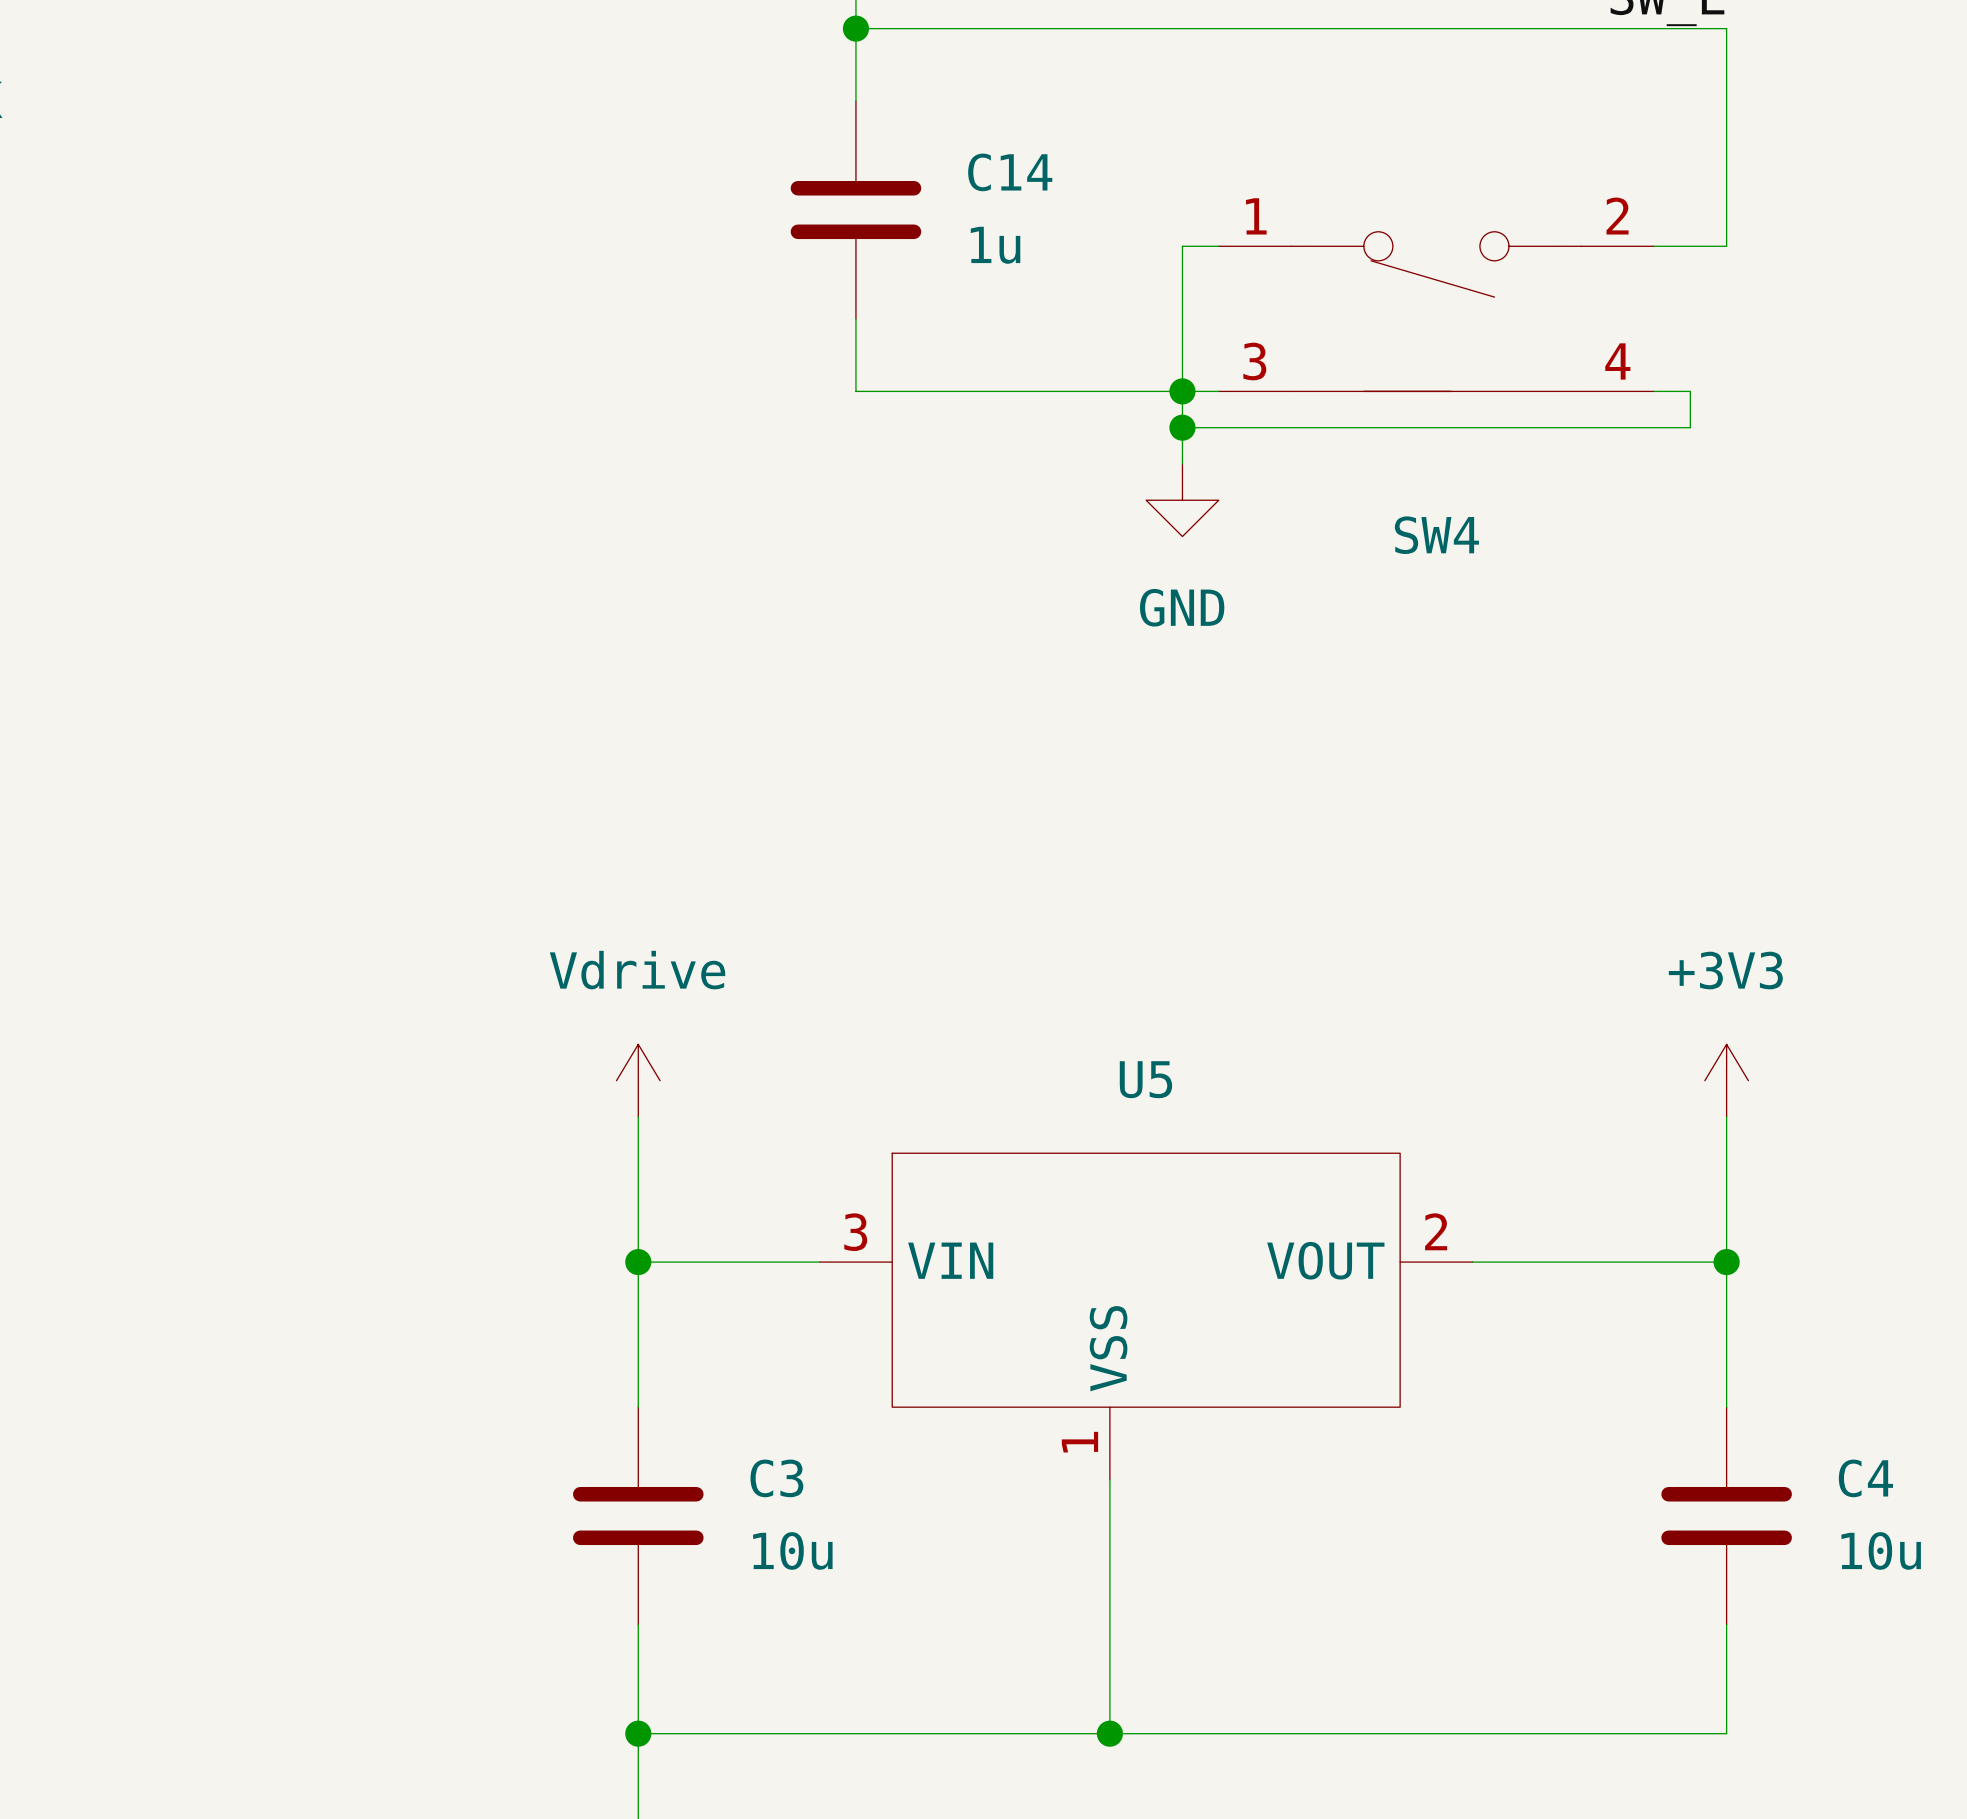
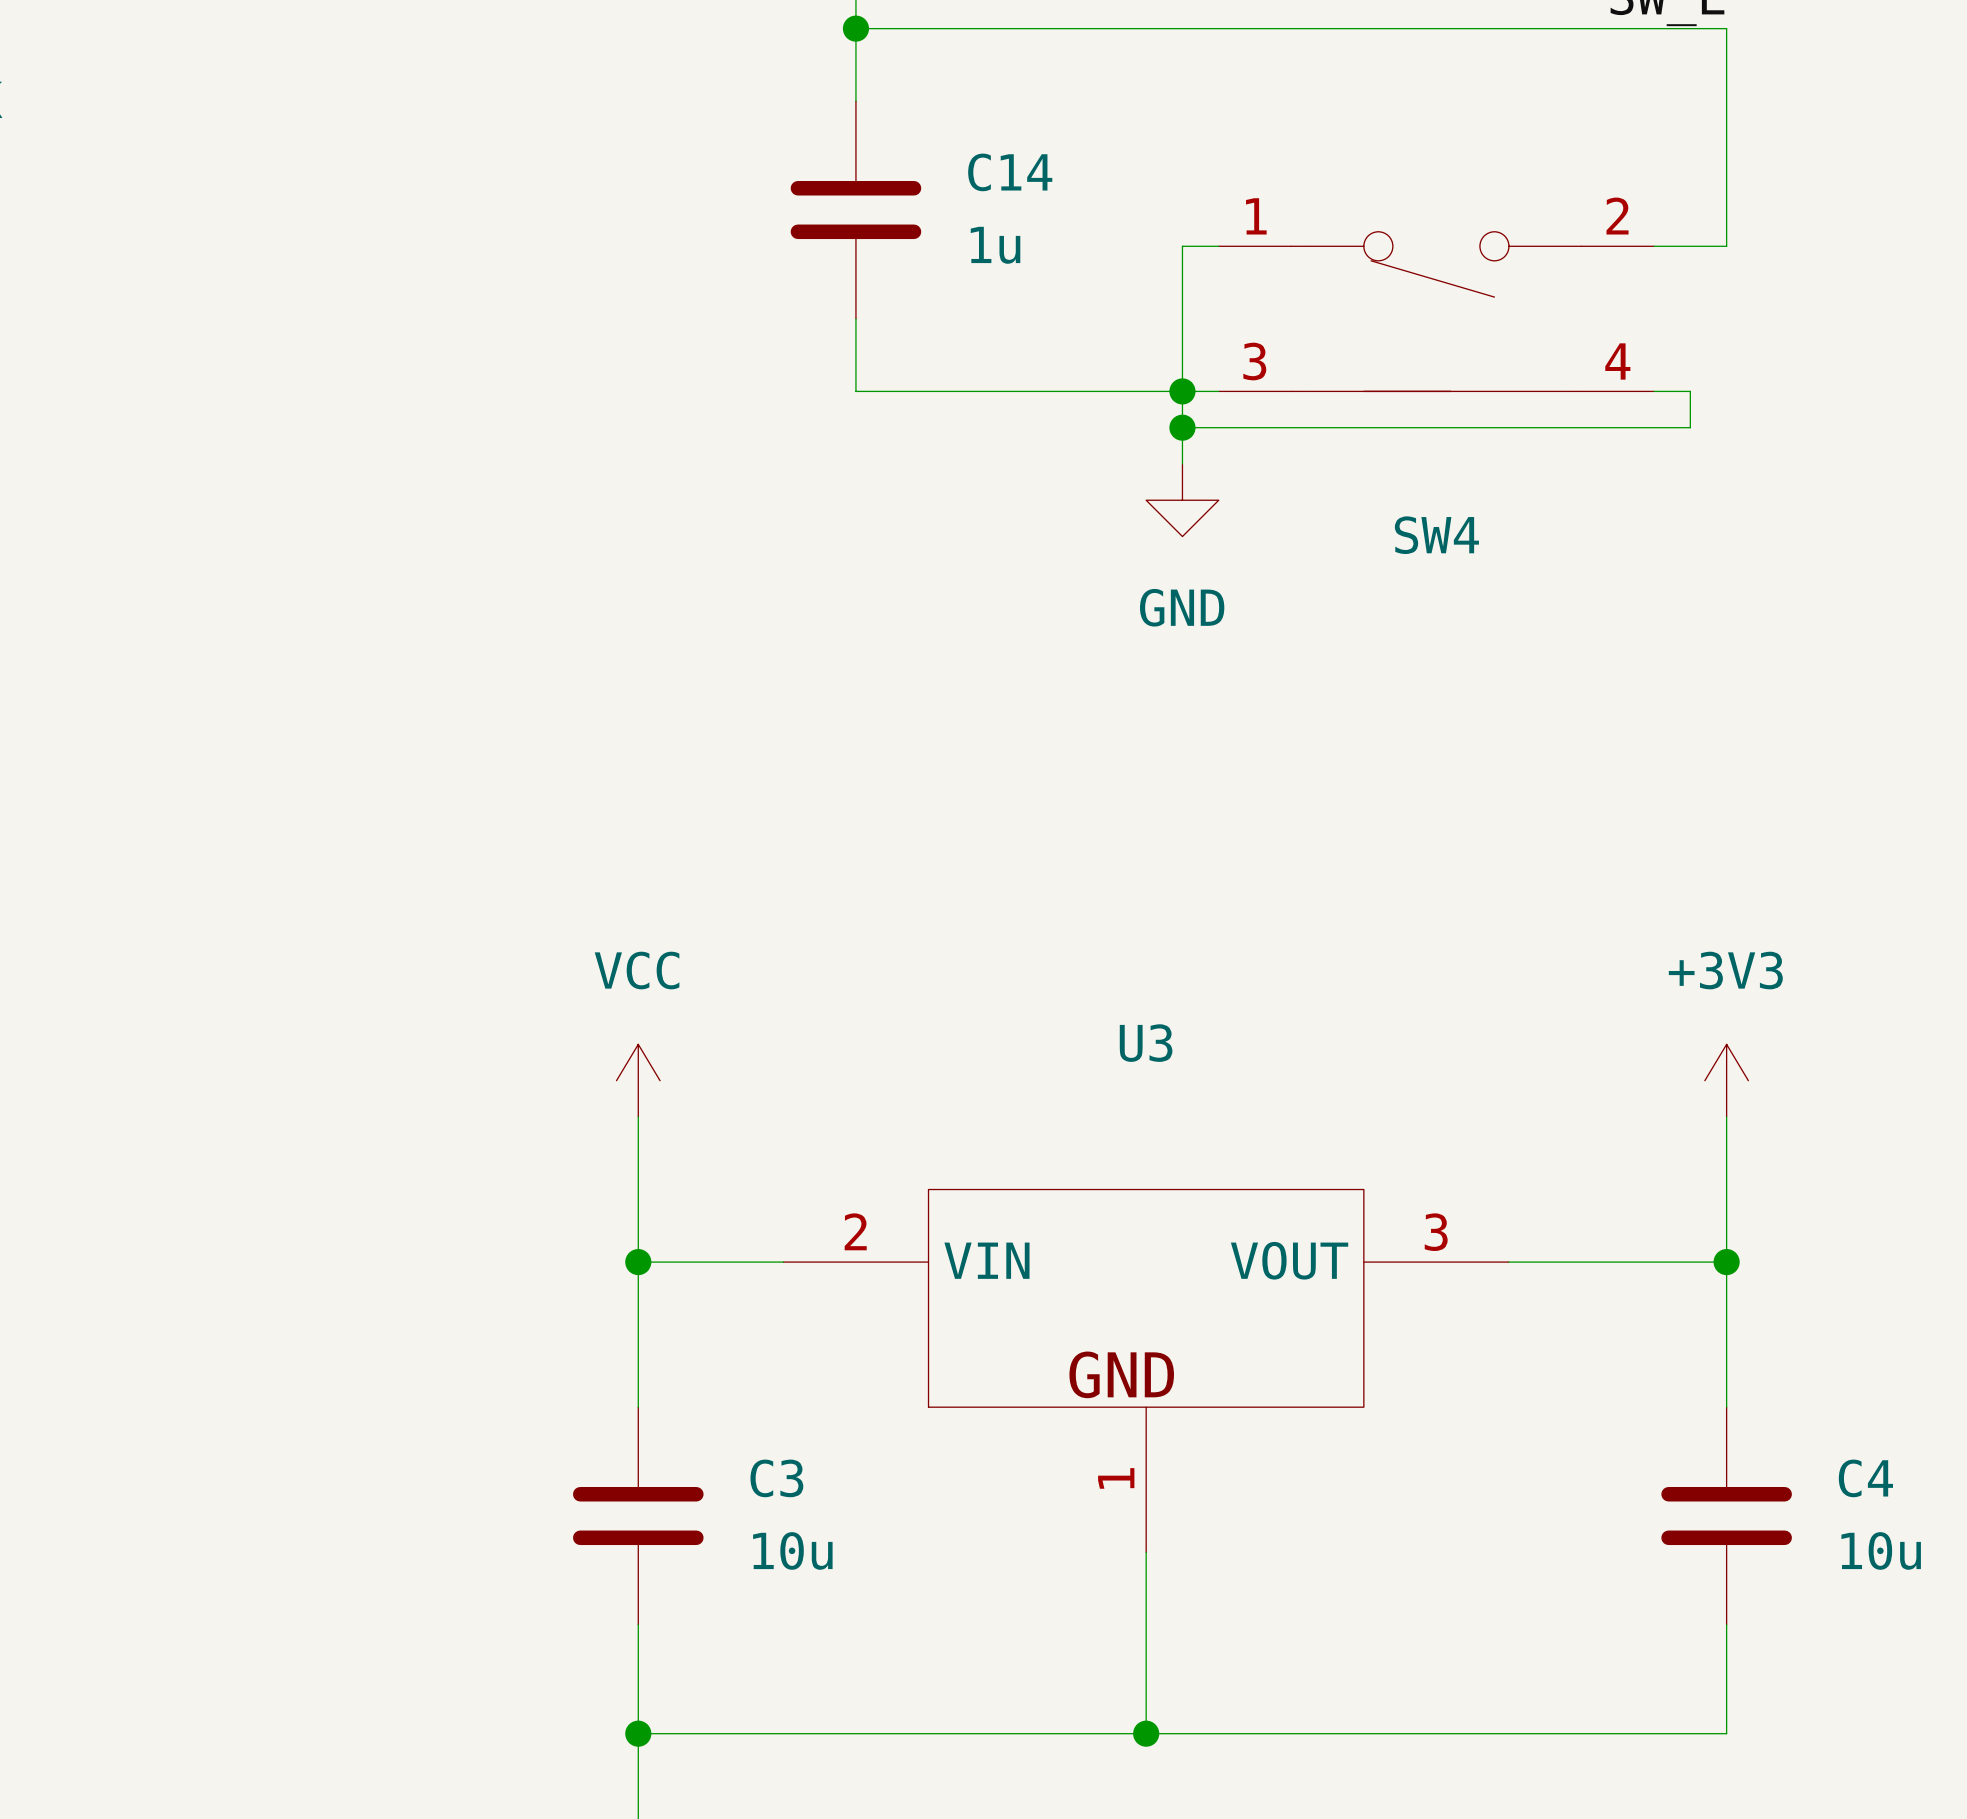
power symbol: Vdrive (638, 1080) -> VCC (638, 1080)
U5: (1146, 1316) -> none
U3: none -> (1146, 1370)
wire: (1109, 1479) (1109, 1733) -> none
wire: none -> (1146, 1552) (1146, 1733)
junction position: (1109, 1733) -> (1146, 1733)

